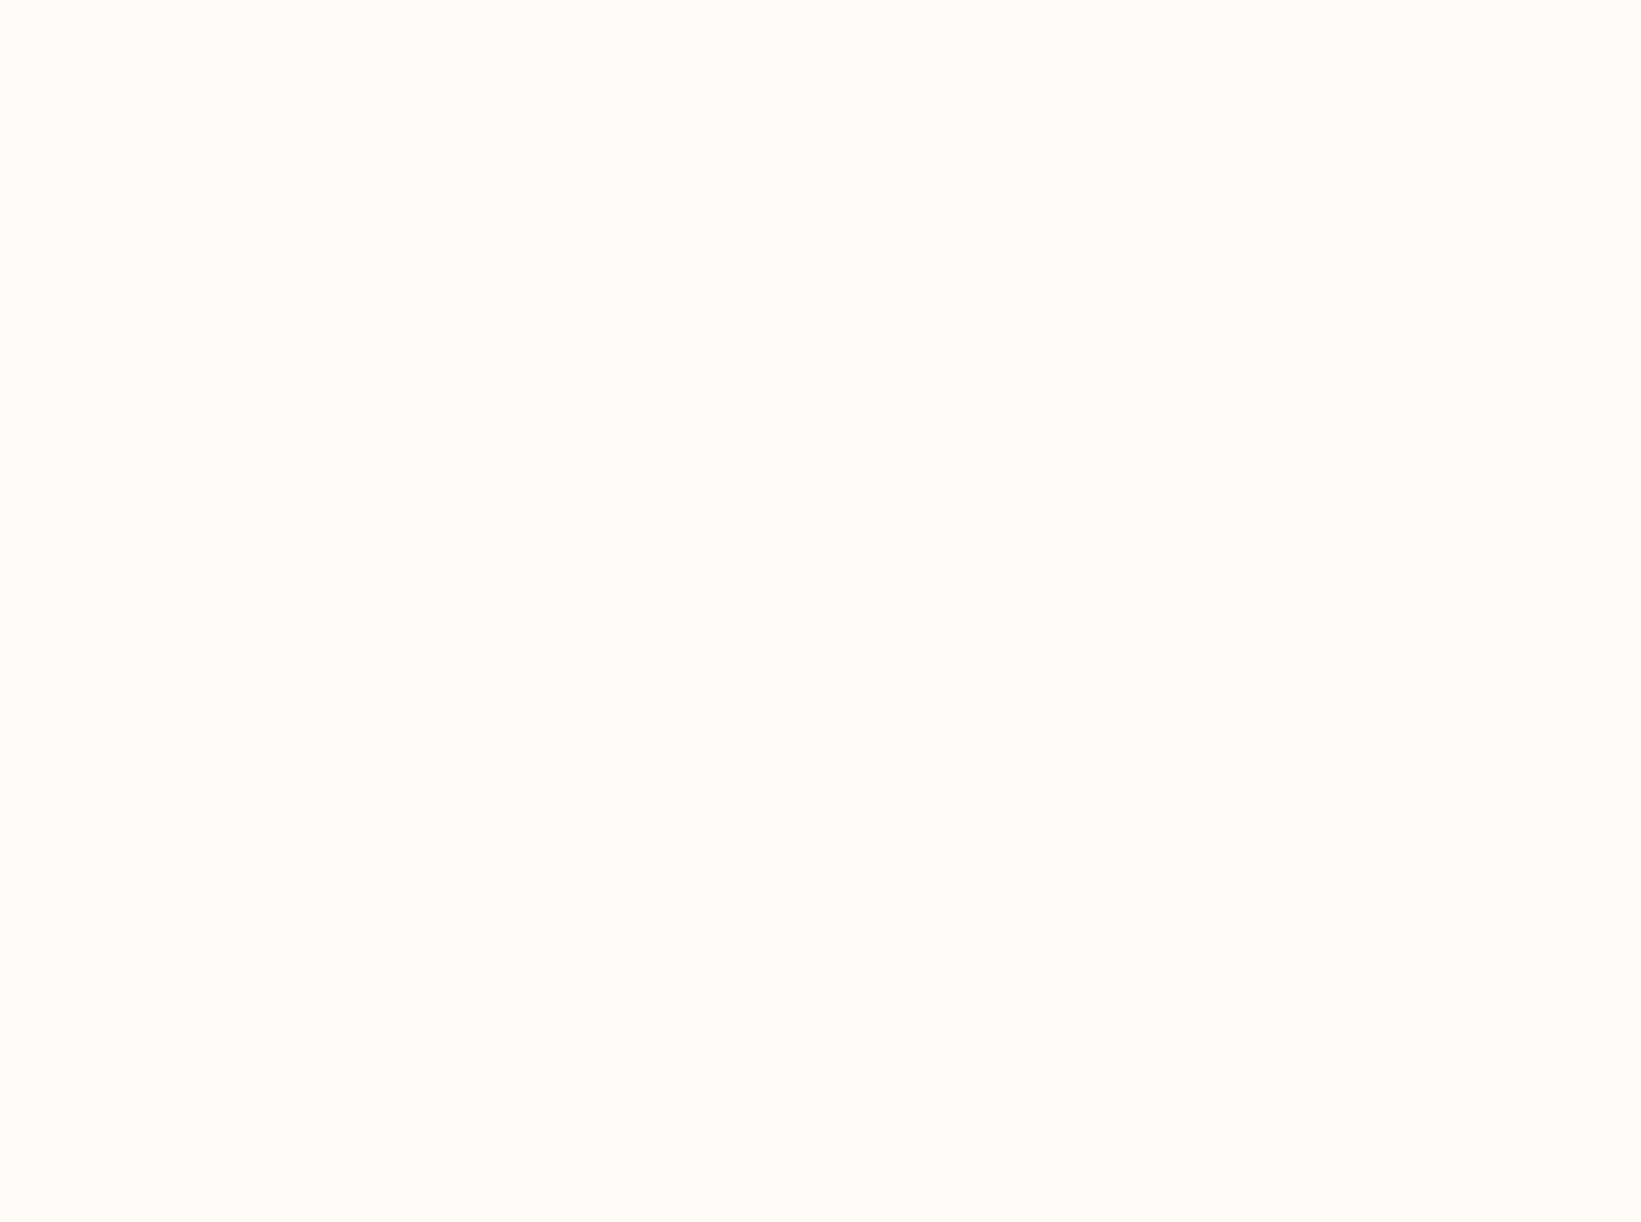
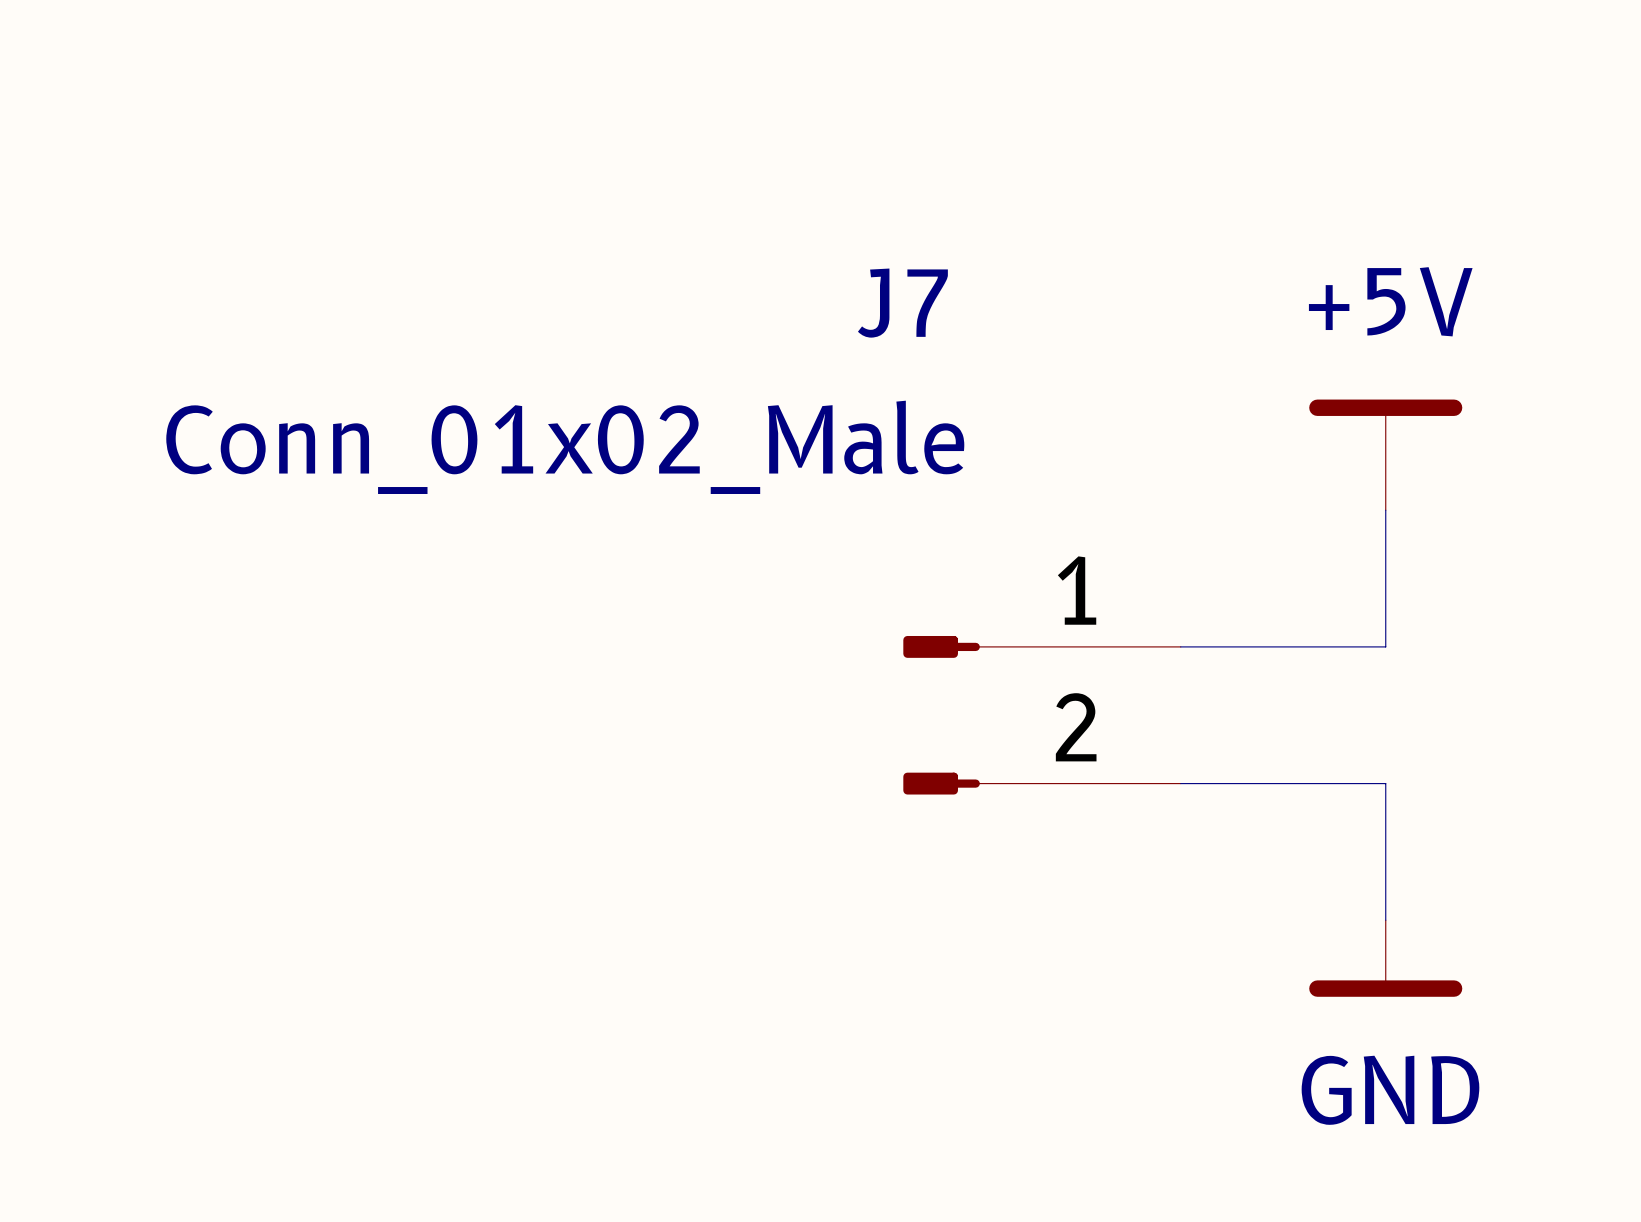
power symbol: none -> +5V (1385, 454)
wire: none -> (1385, 510) (1385, 646) (1180, 646)
J7: none -> Conn_01x02_Male (1042, 715)
wire: none -> (1180, 783) (1385, 783) (1385, 920)
power symbol: none -> GND (1385, 958)

